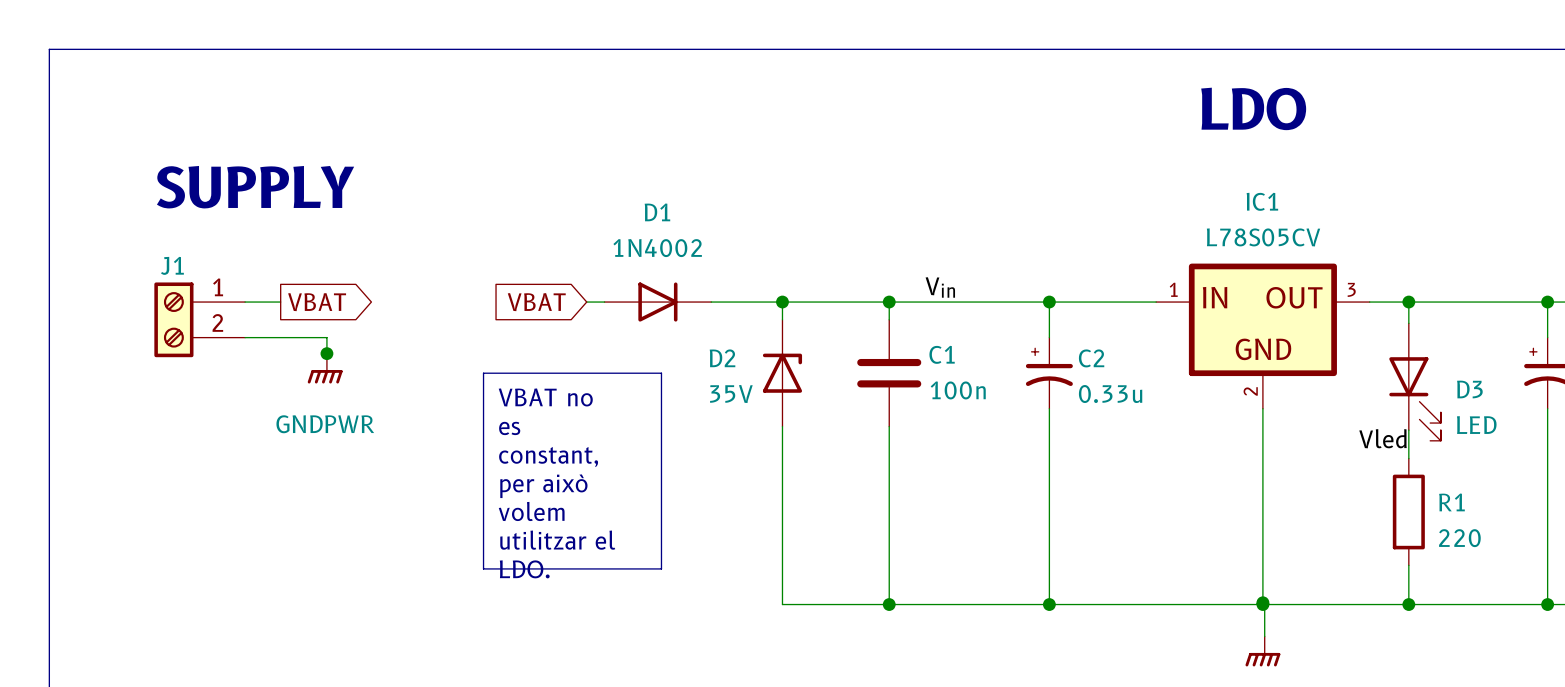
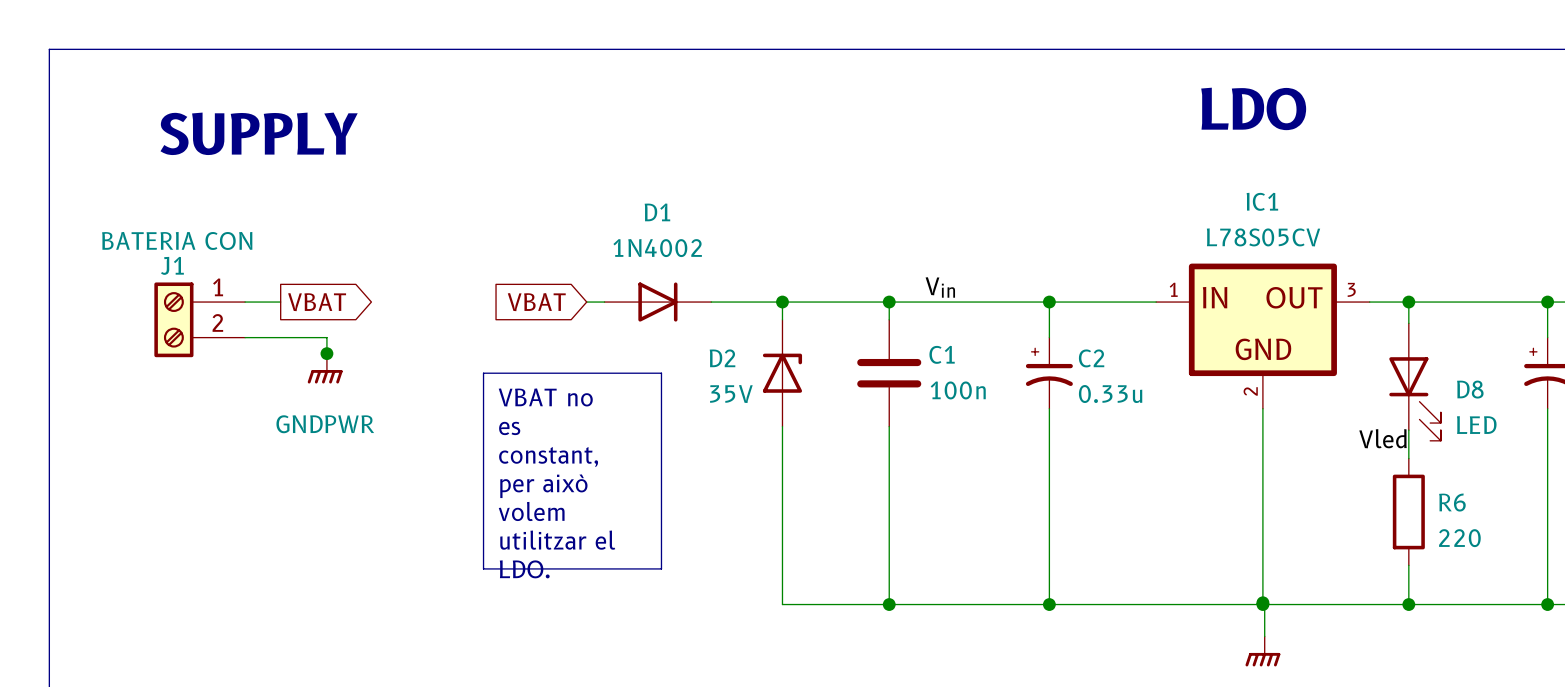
text position: SUPPLY (255, 187) -> SUPPLY (259, 133)
J1 value: none -> BATERIA CON (177, 240)
D3 name: D3 (1469, 389) -> D8 (1470, 389)
R1 name: R1 (1451, 502) -> R6 (1452, 502)

